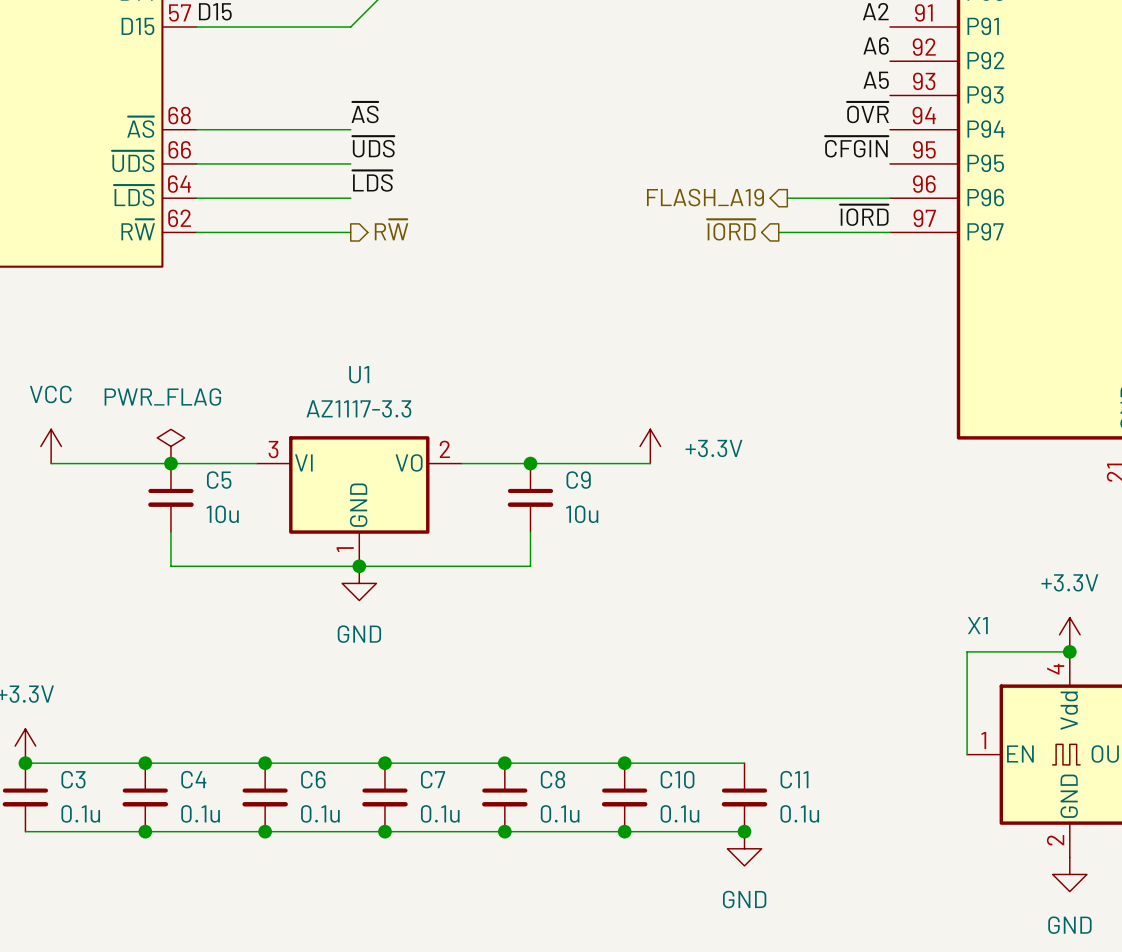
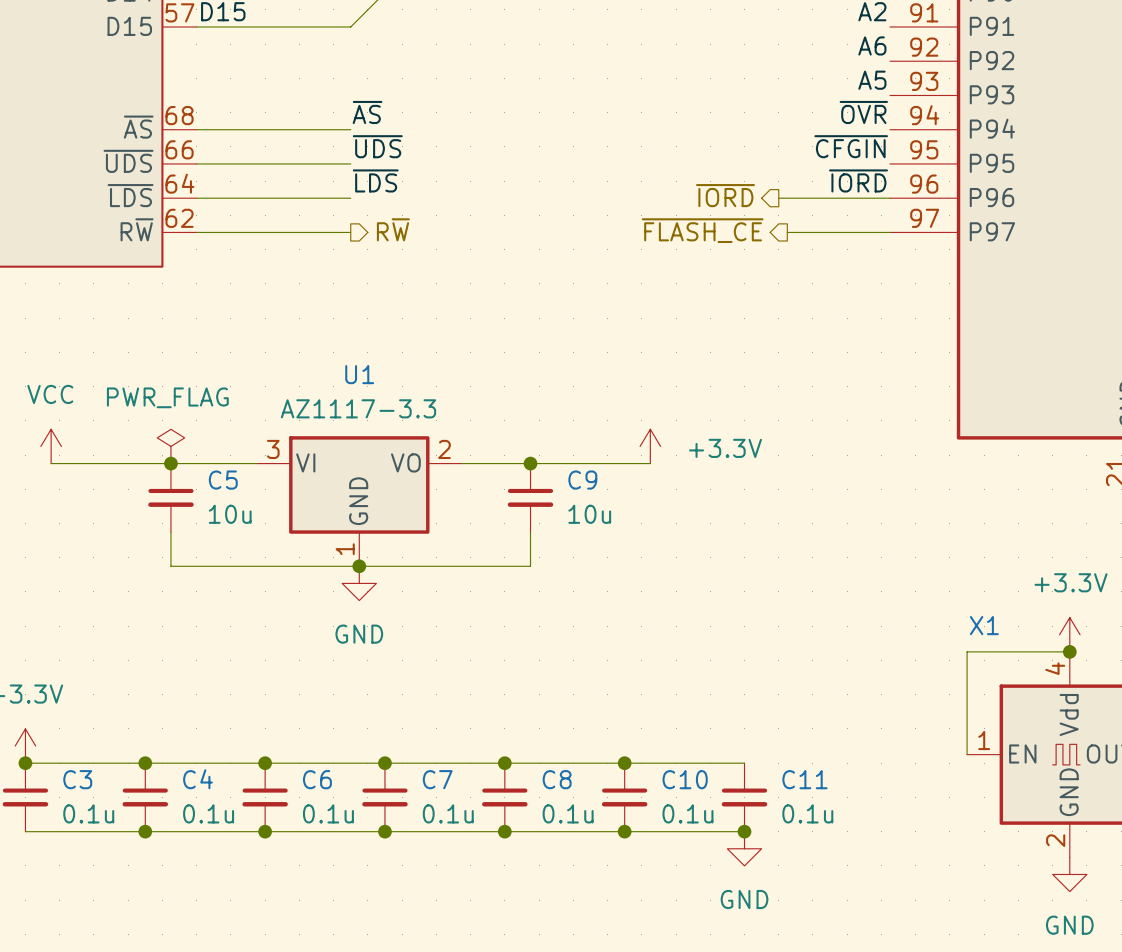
hierarchical label: FLASH_A19 (705, 197) -> ~{IORD} (725, 195)
label position: ~{IORD} (864, 215) -> ~{IORD} (858, 180)
hierarchical label: ~{IORD} (731, 229) -> ~{FLASH_CE} (702, 230)
wire: (778, 232) (787, 232) -> (778, 198) (787, 198)

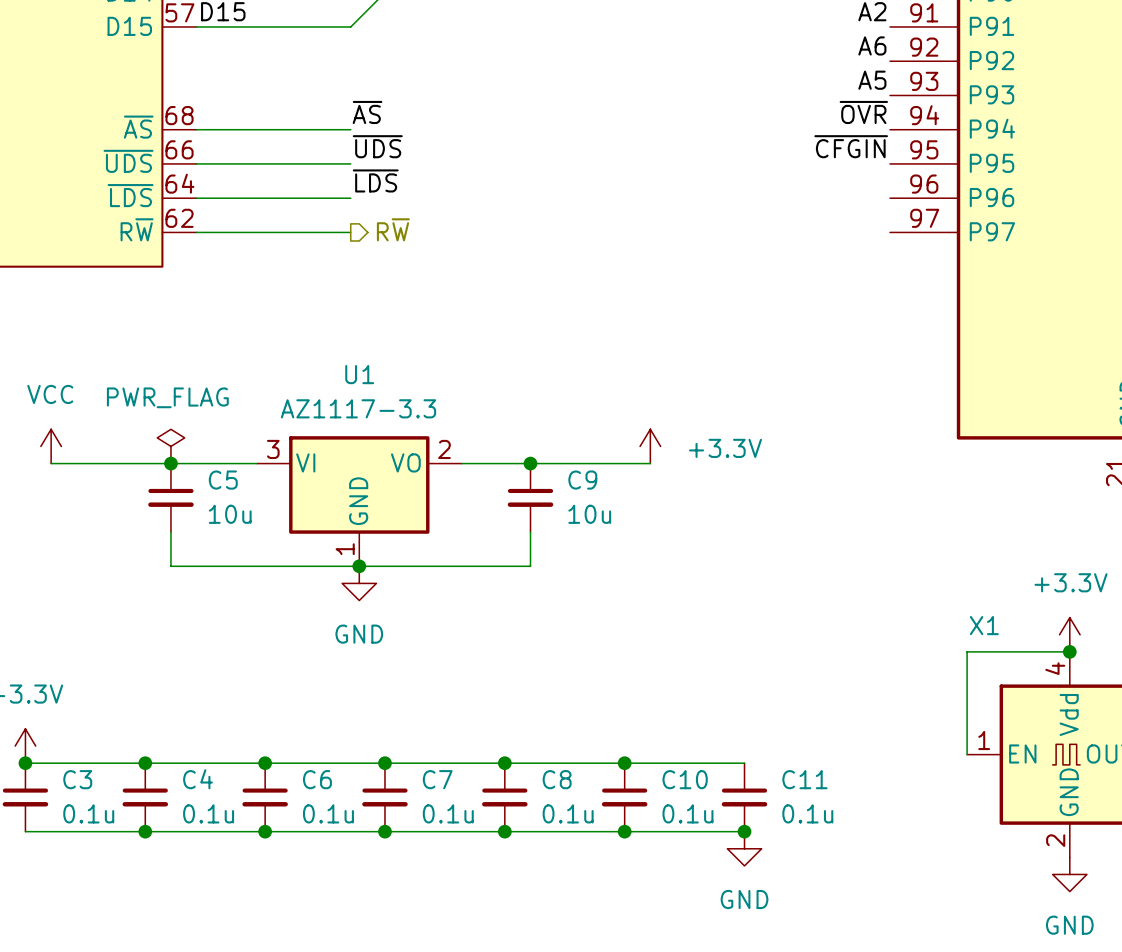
label: ~{IORD} (858, 180) -> none
hierarchical label: ~{IORD} (725, 195) -> none
wire: (778, 198) (890, 198) -> none
hierarchical label: ~{FLASH_CE} (702, 230) -> none
wire: (787, 232) (890, 232) -> none

